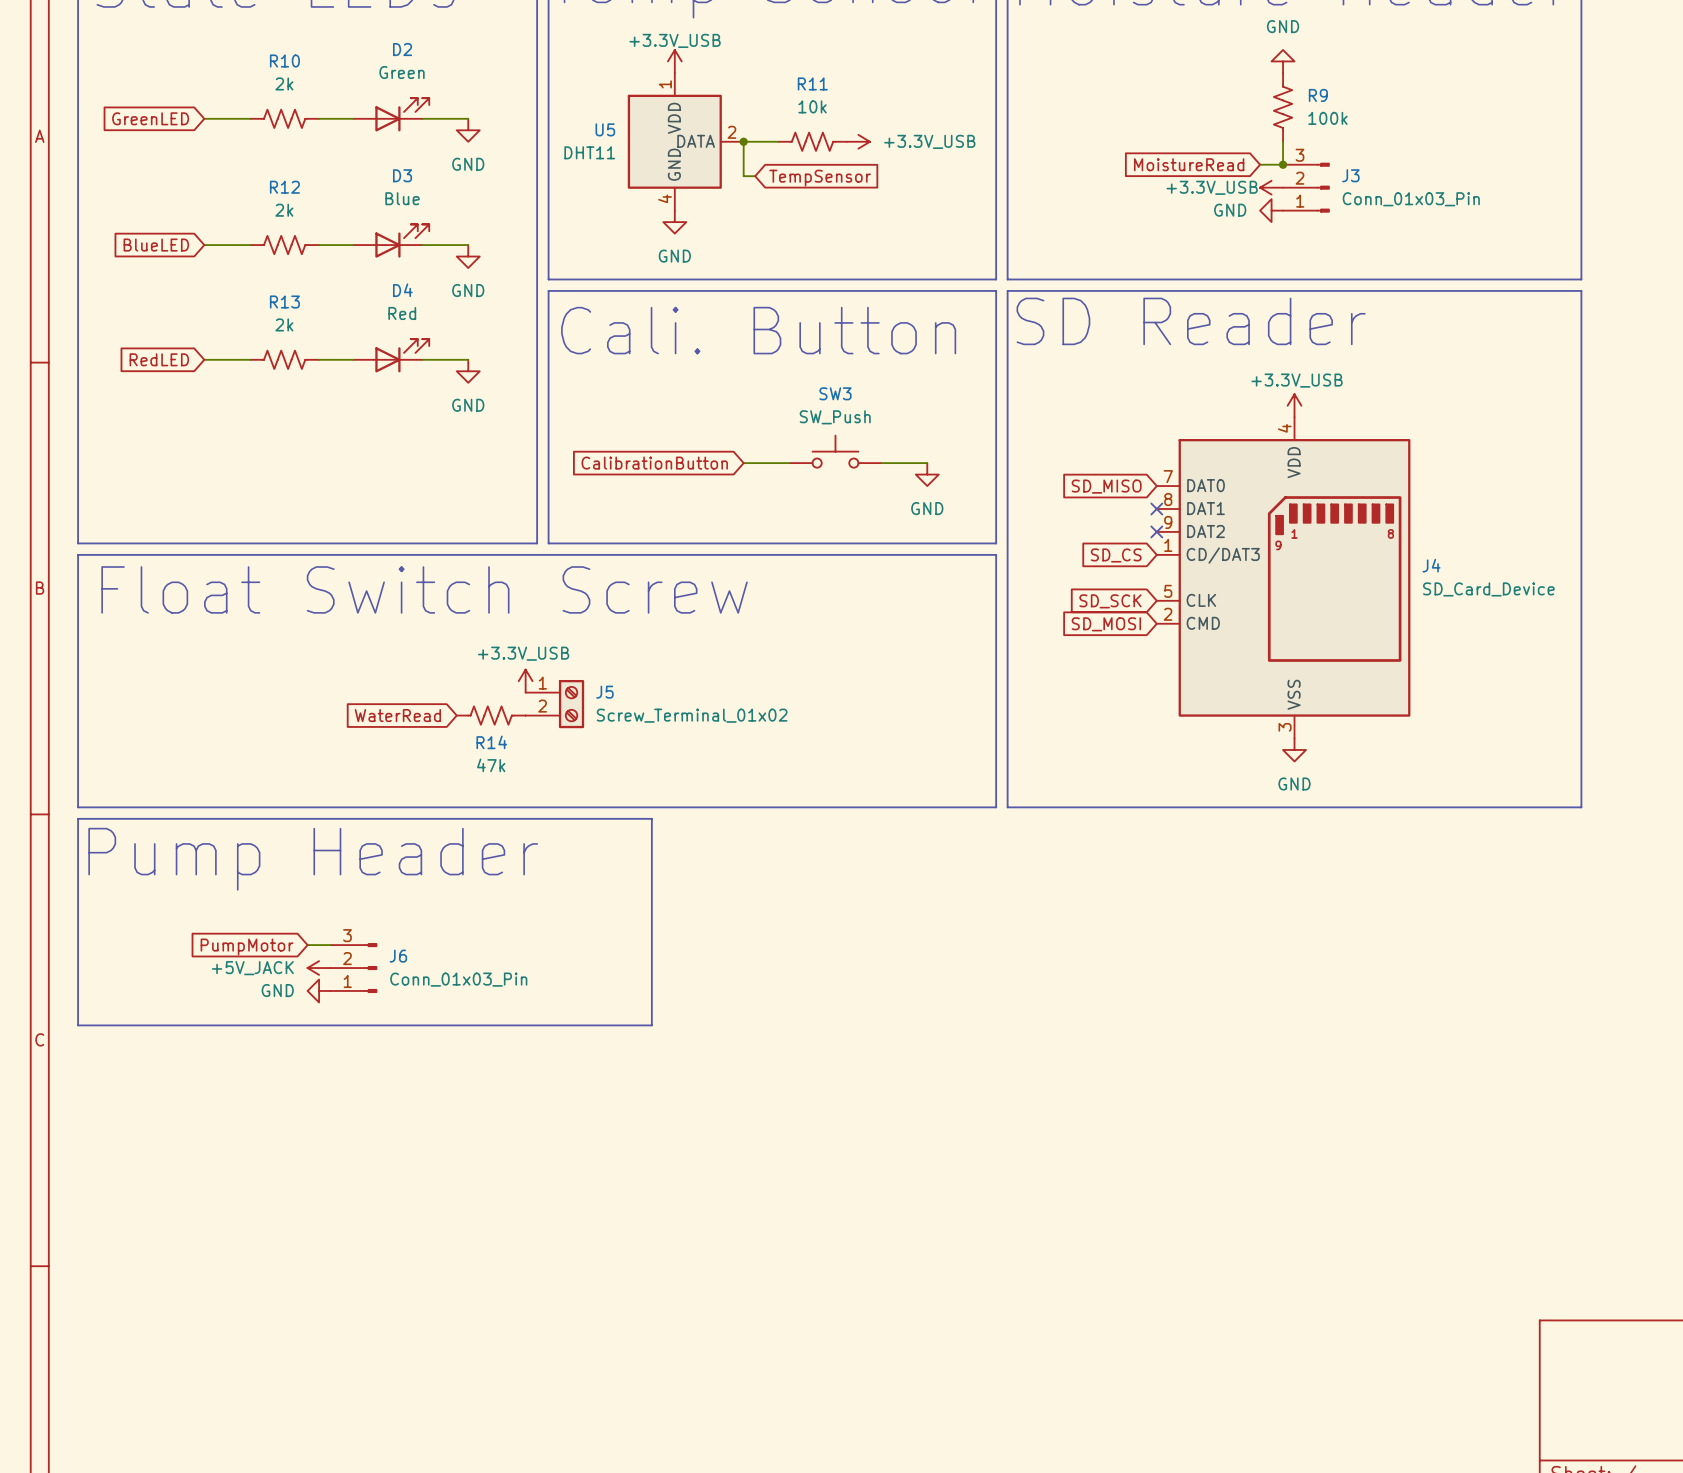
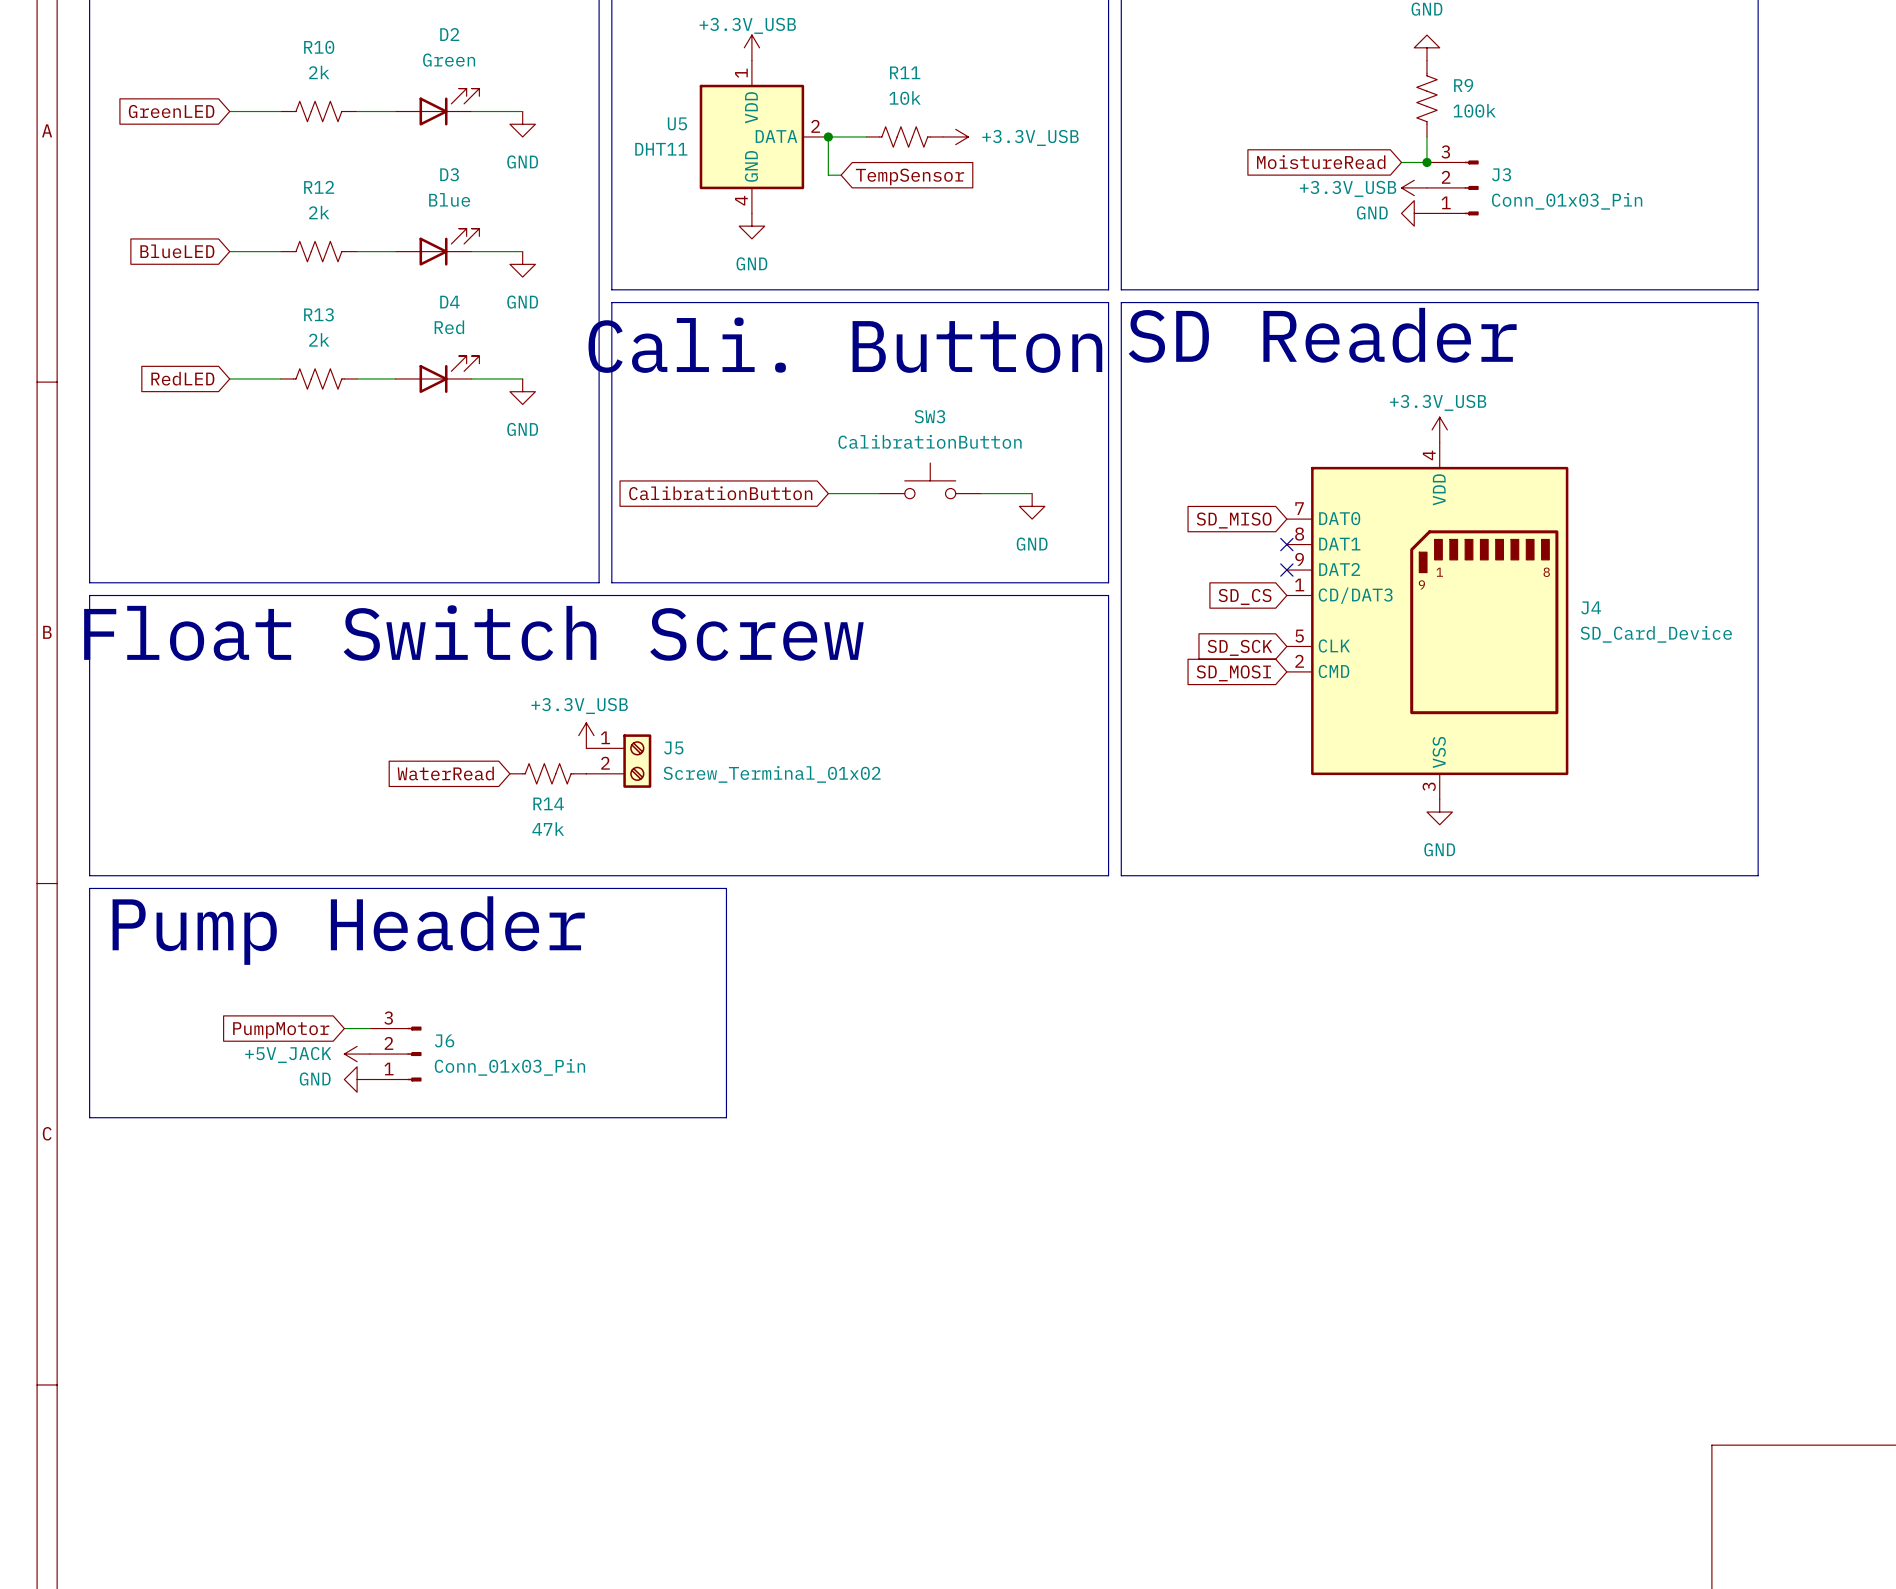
SW3 value: SW_Push (835, 417) -> CalibrationButton (930, 441)

